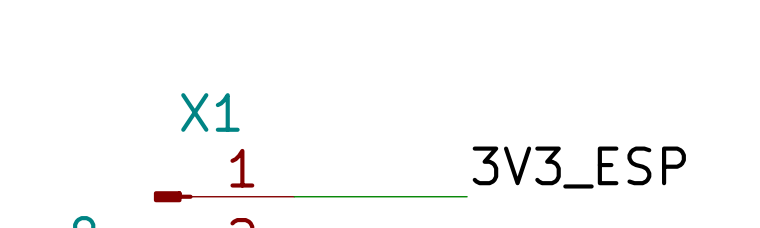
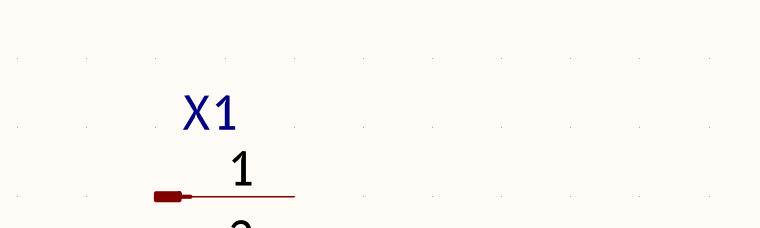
label: 3V3_ESP (579, 167) -> none
wire: (294, 196) (467, 196) -> none

